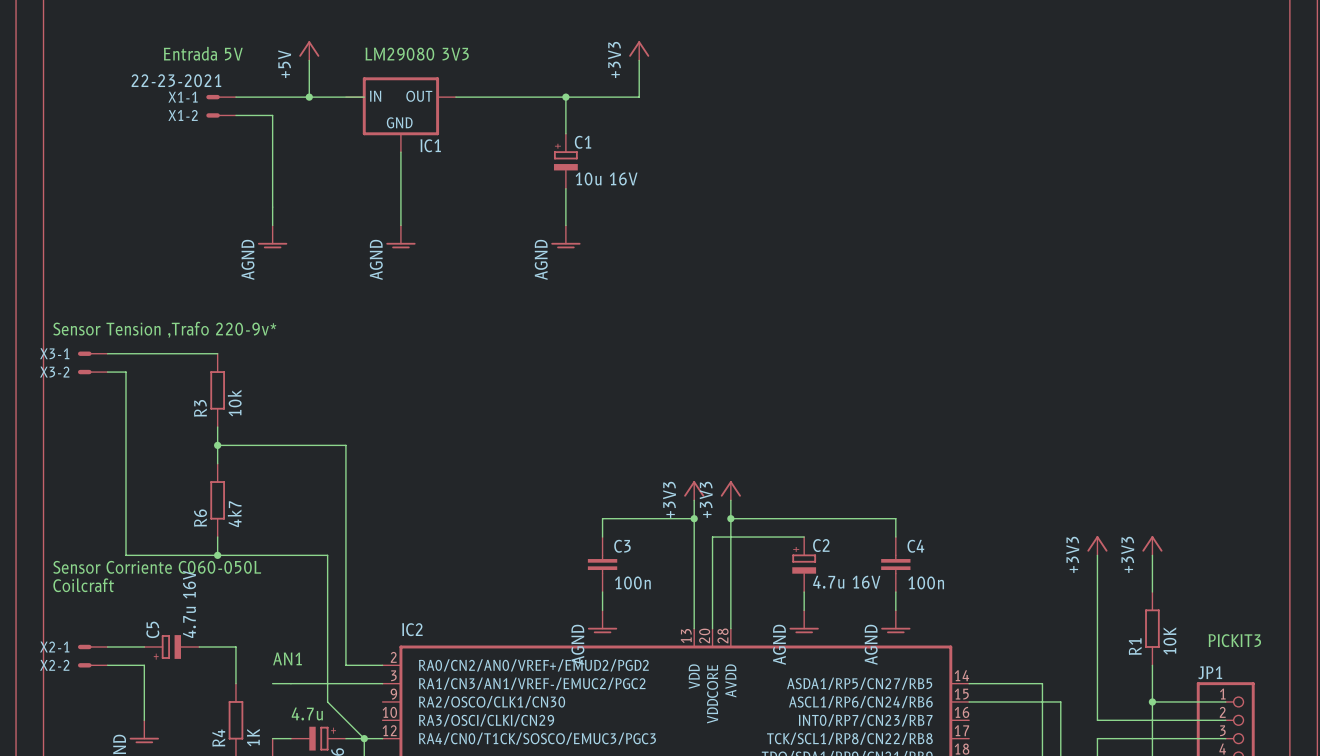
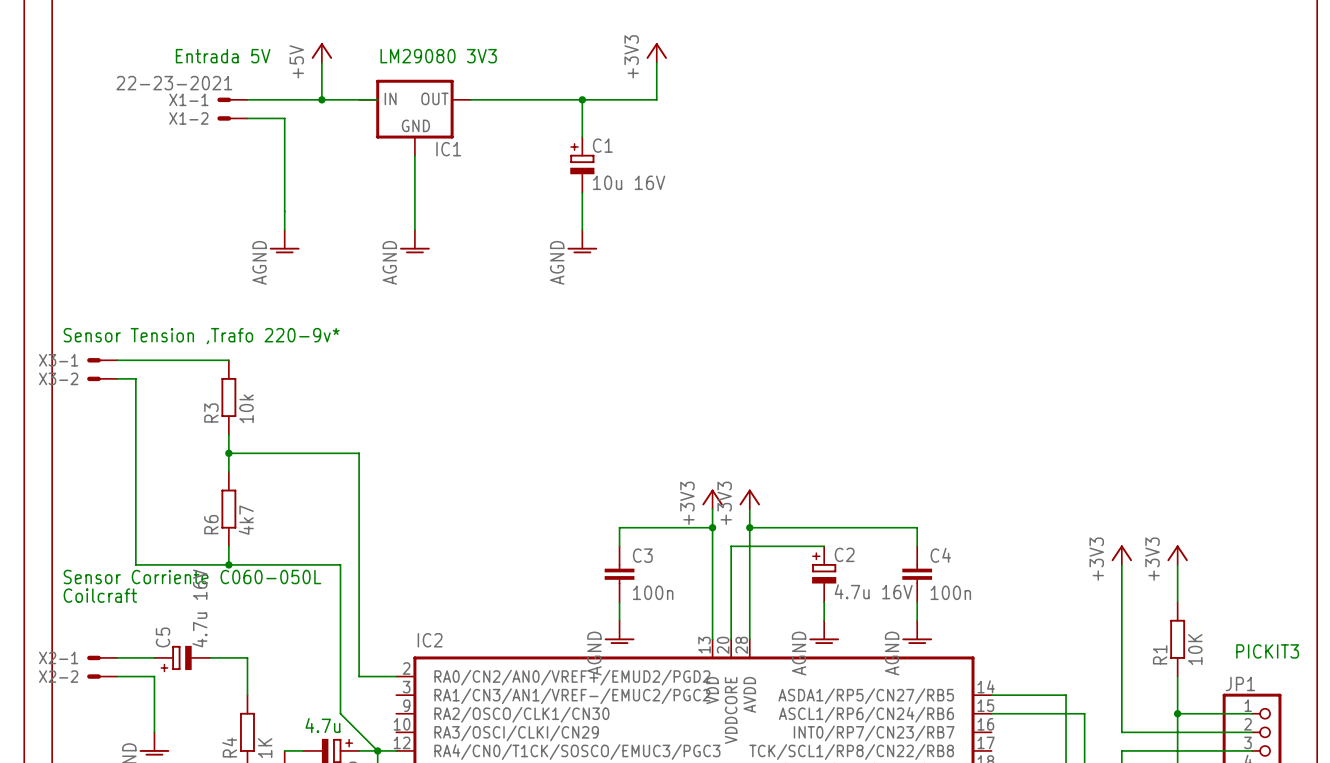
text: AN1 (287, 658) -> none
wire: (272, 683) (382, 683) -> none

